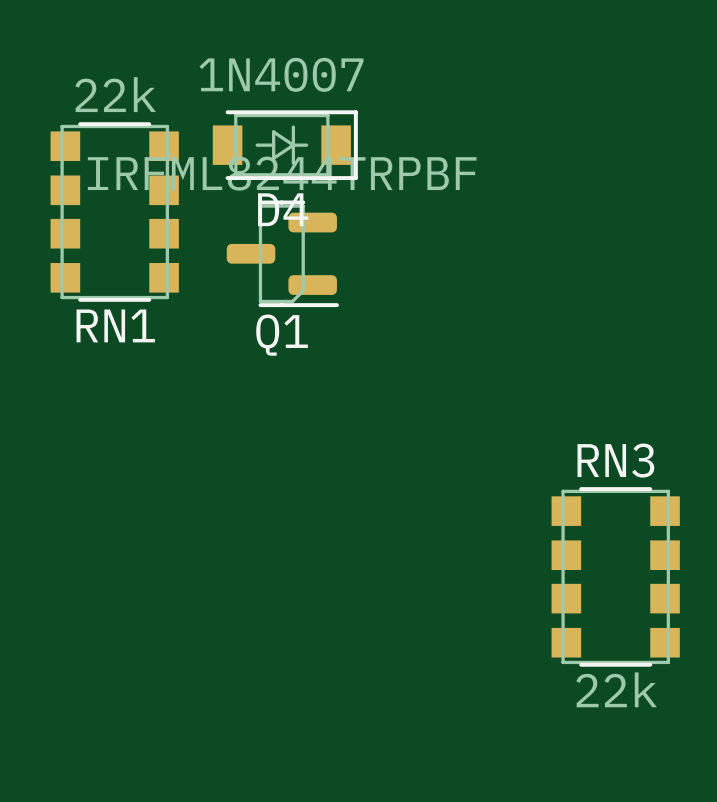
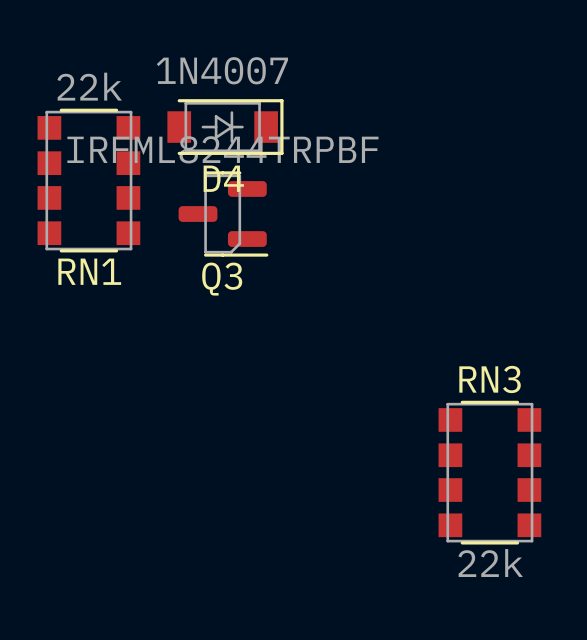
Q1 name: Q1 (282, 335) -> Q3 (222, 279)

